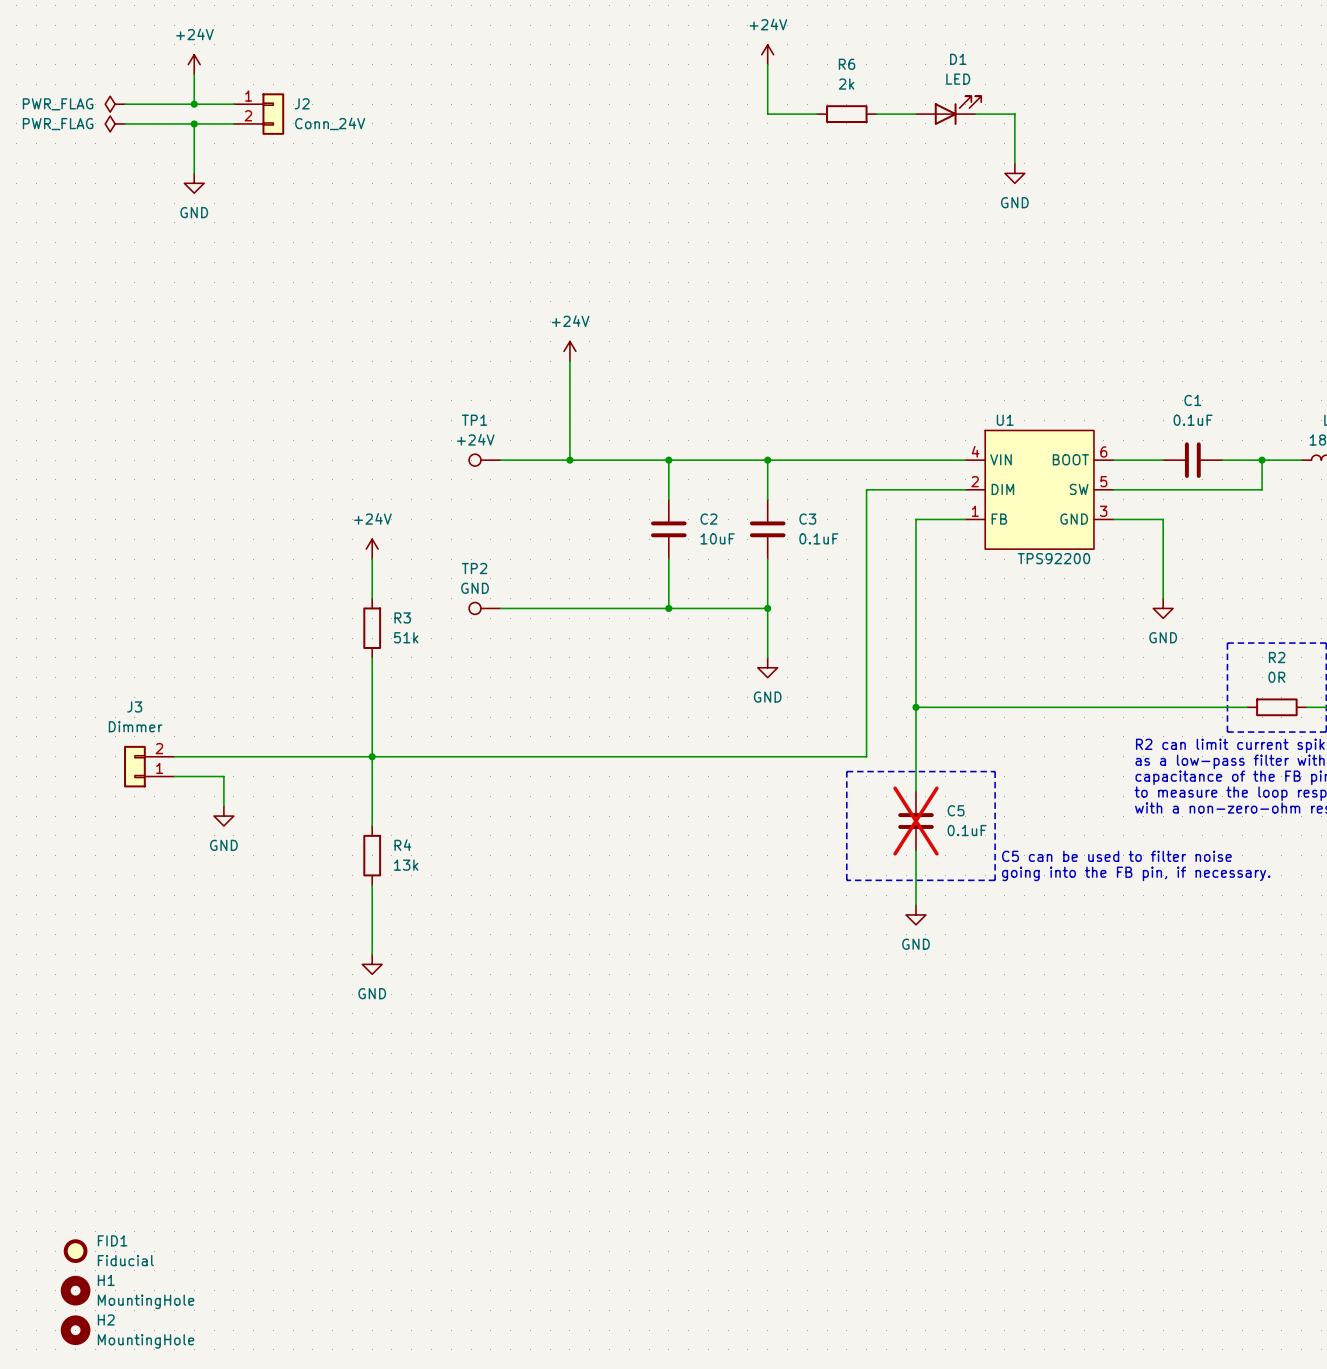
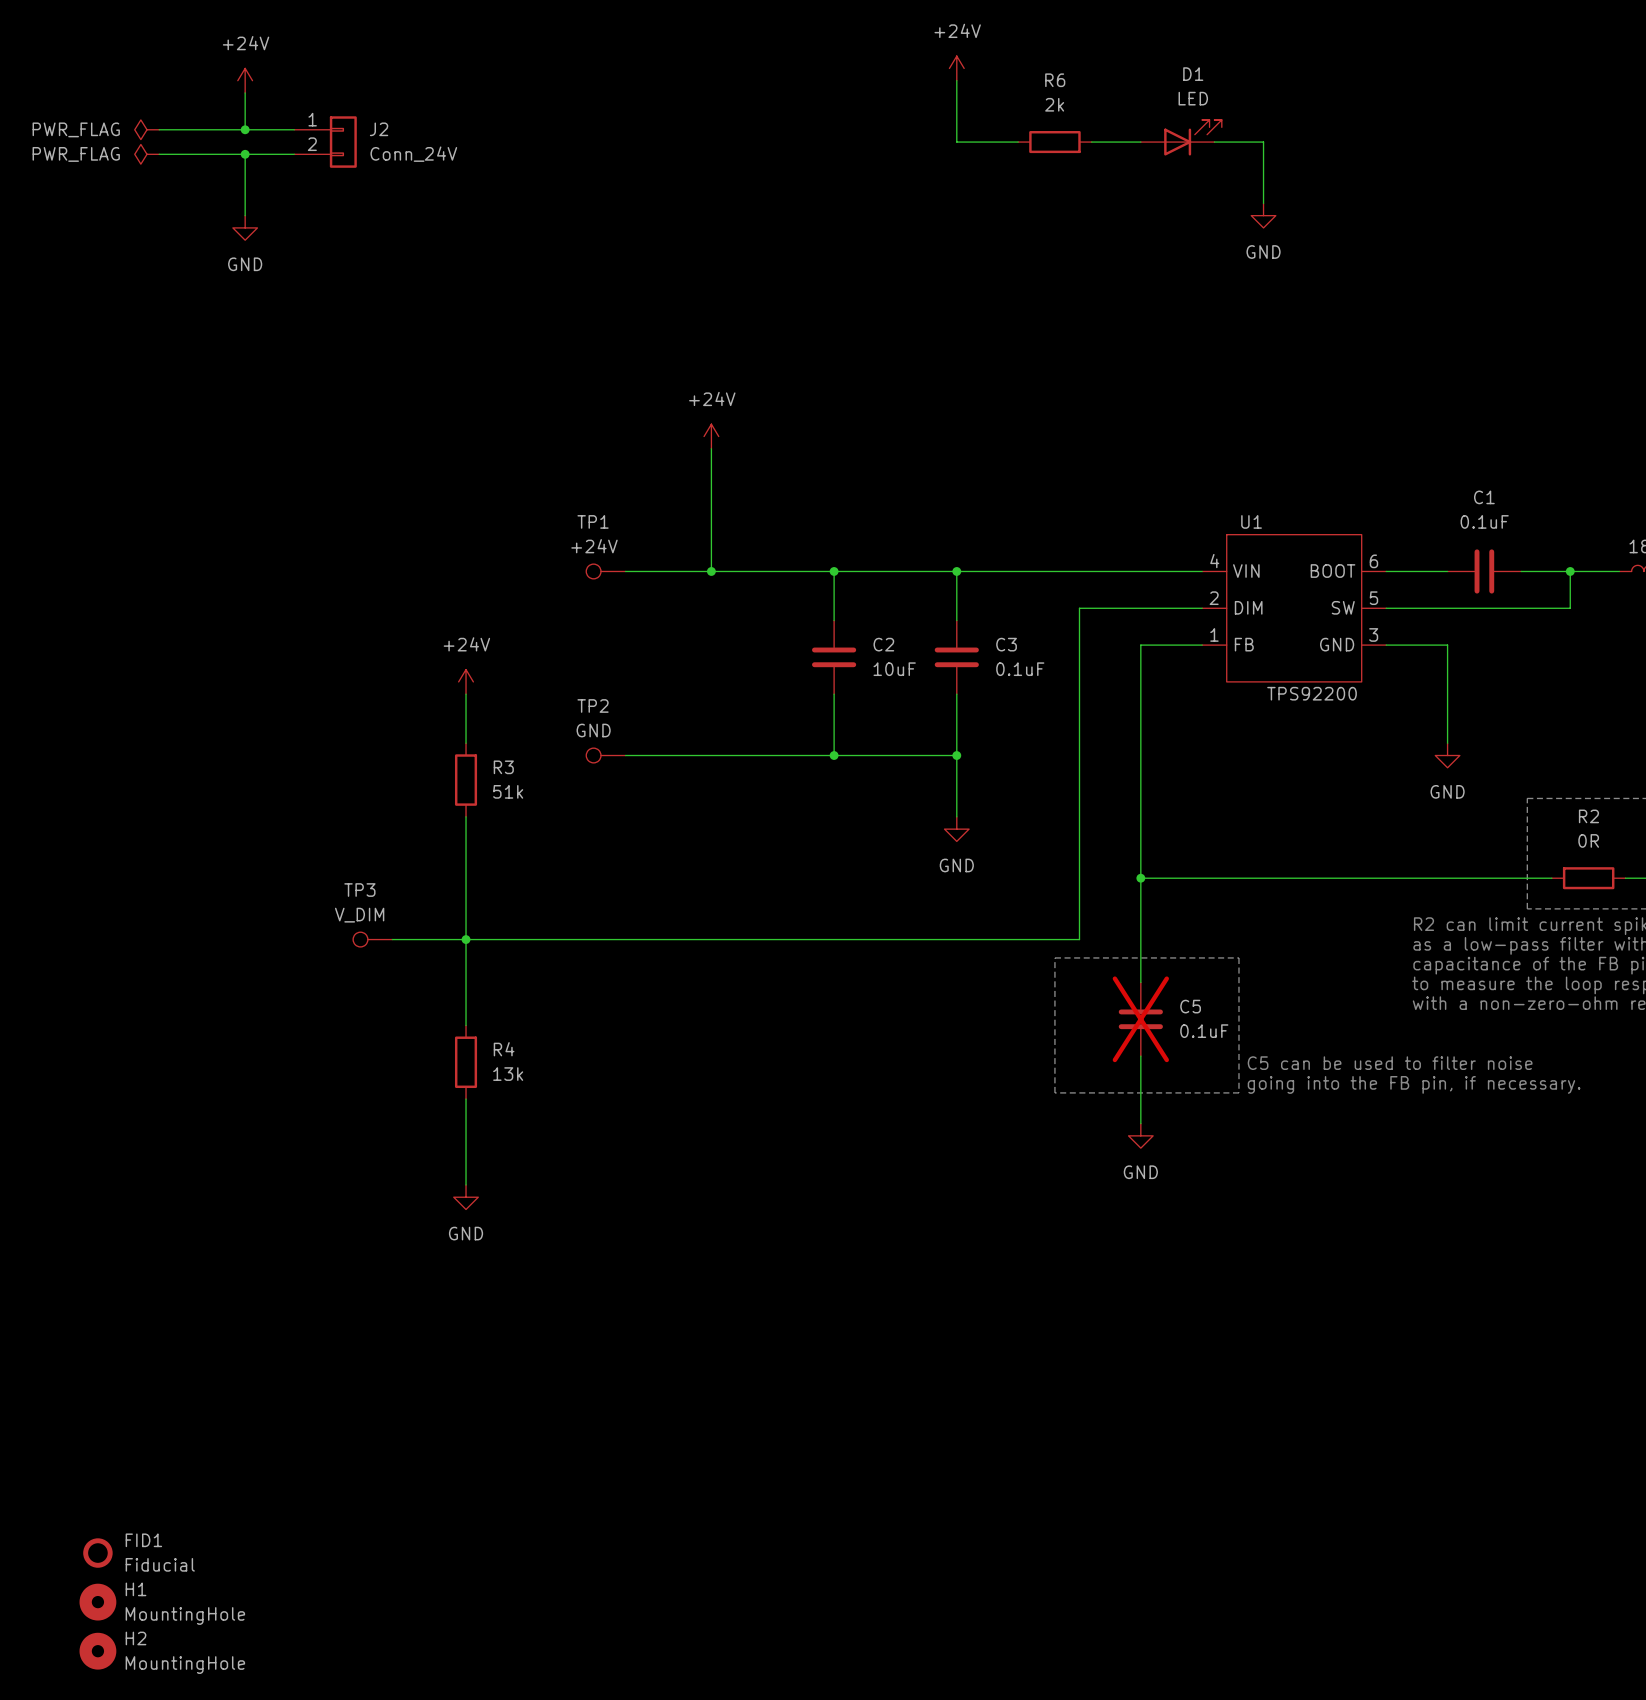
wire: (174, 756) (312, 756) -> none
TP3: none -> V_DIM (372, 939)
J3: Dimmer (149, 766) -> none
wire: (174, 776) (223, 776) (223, 806) -> none
power symbol: GND (223, 816) -> none

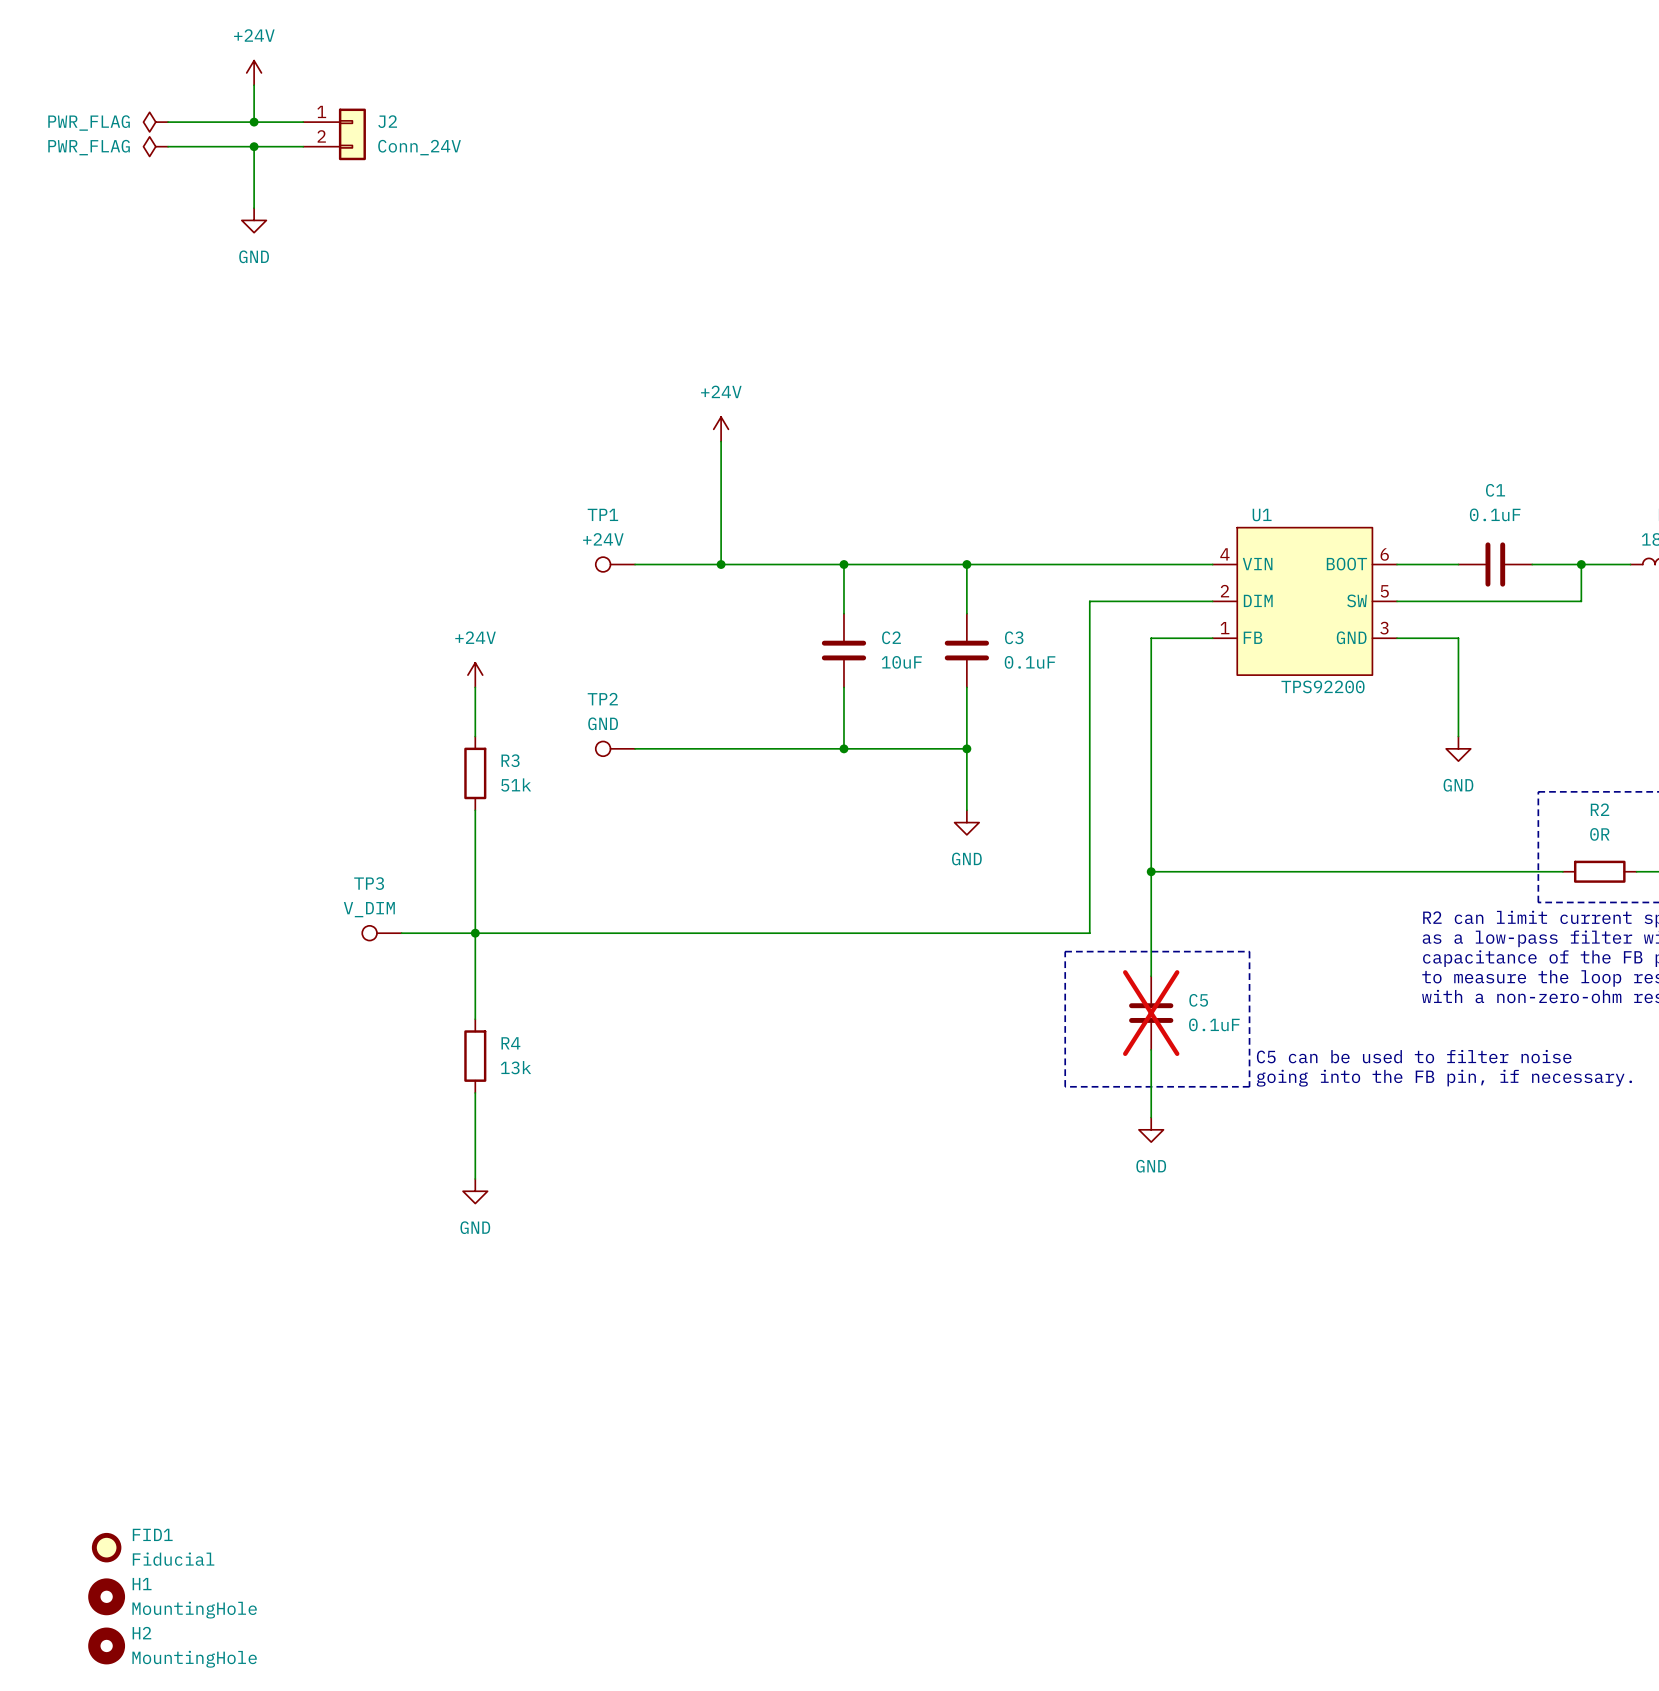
power symbol: +24V (956, 68) -> none
wire: (956, 80) (956, 142) (1018, 142) -> none
D1: LED (1181, 137) -> none
R6: 2k (1054, 142) -> none
wire: (1091, 142) (1140, 142) -> none
wire: (1214, 142) (1263, 142) (1263, 203) -> none
power symbol: GND (1263, 215) -> none

